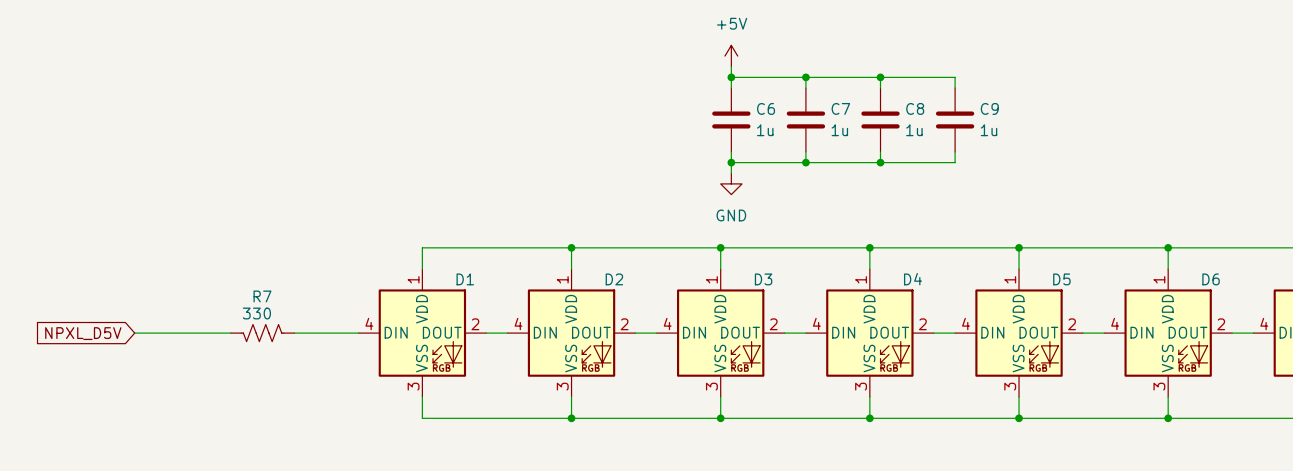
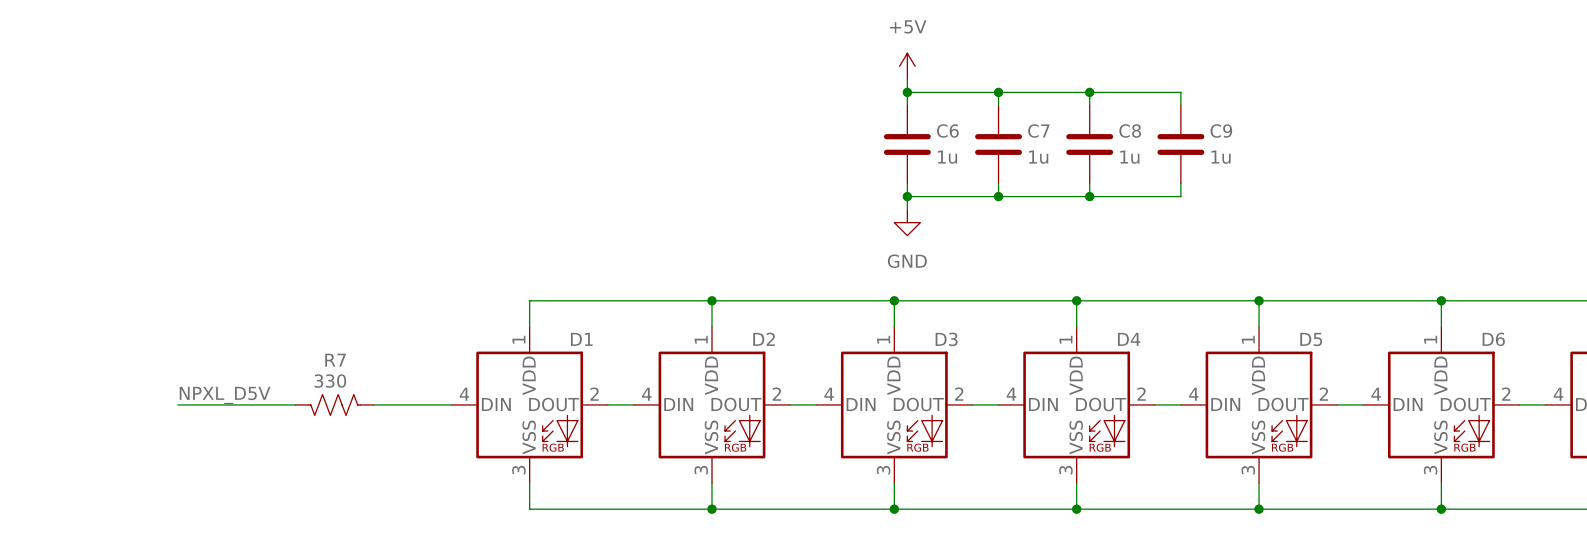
label: none -> NPXL_D5V (225, 395)
global label: NPXL_D5V (83, 333) -> none

